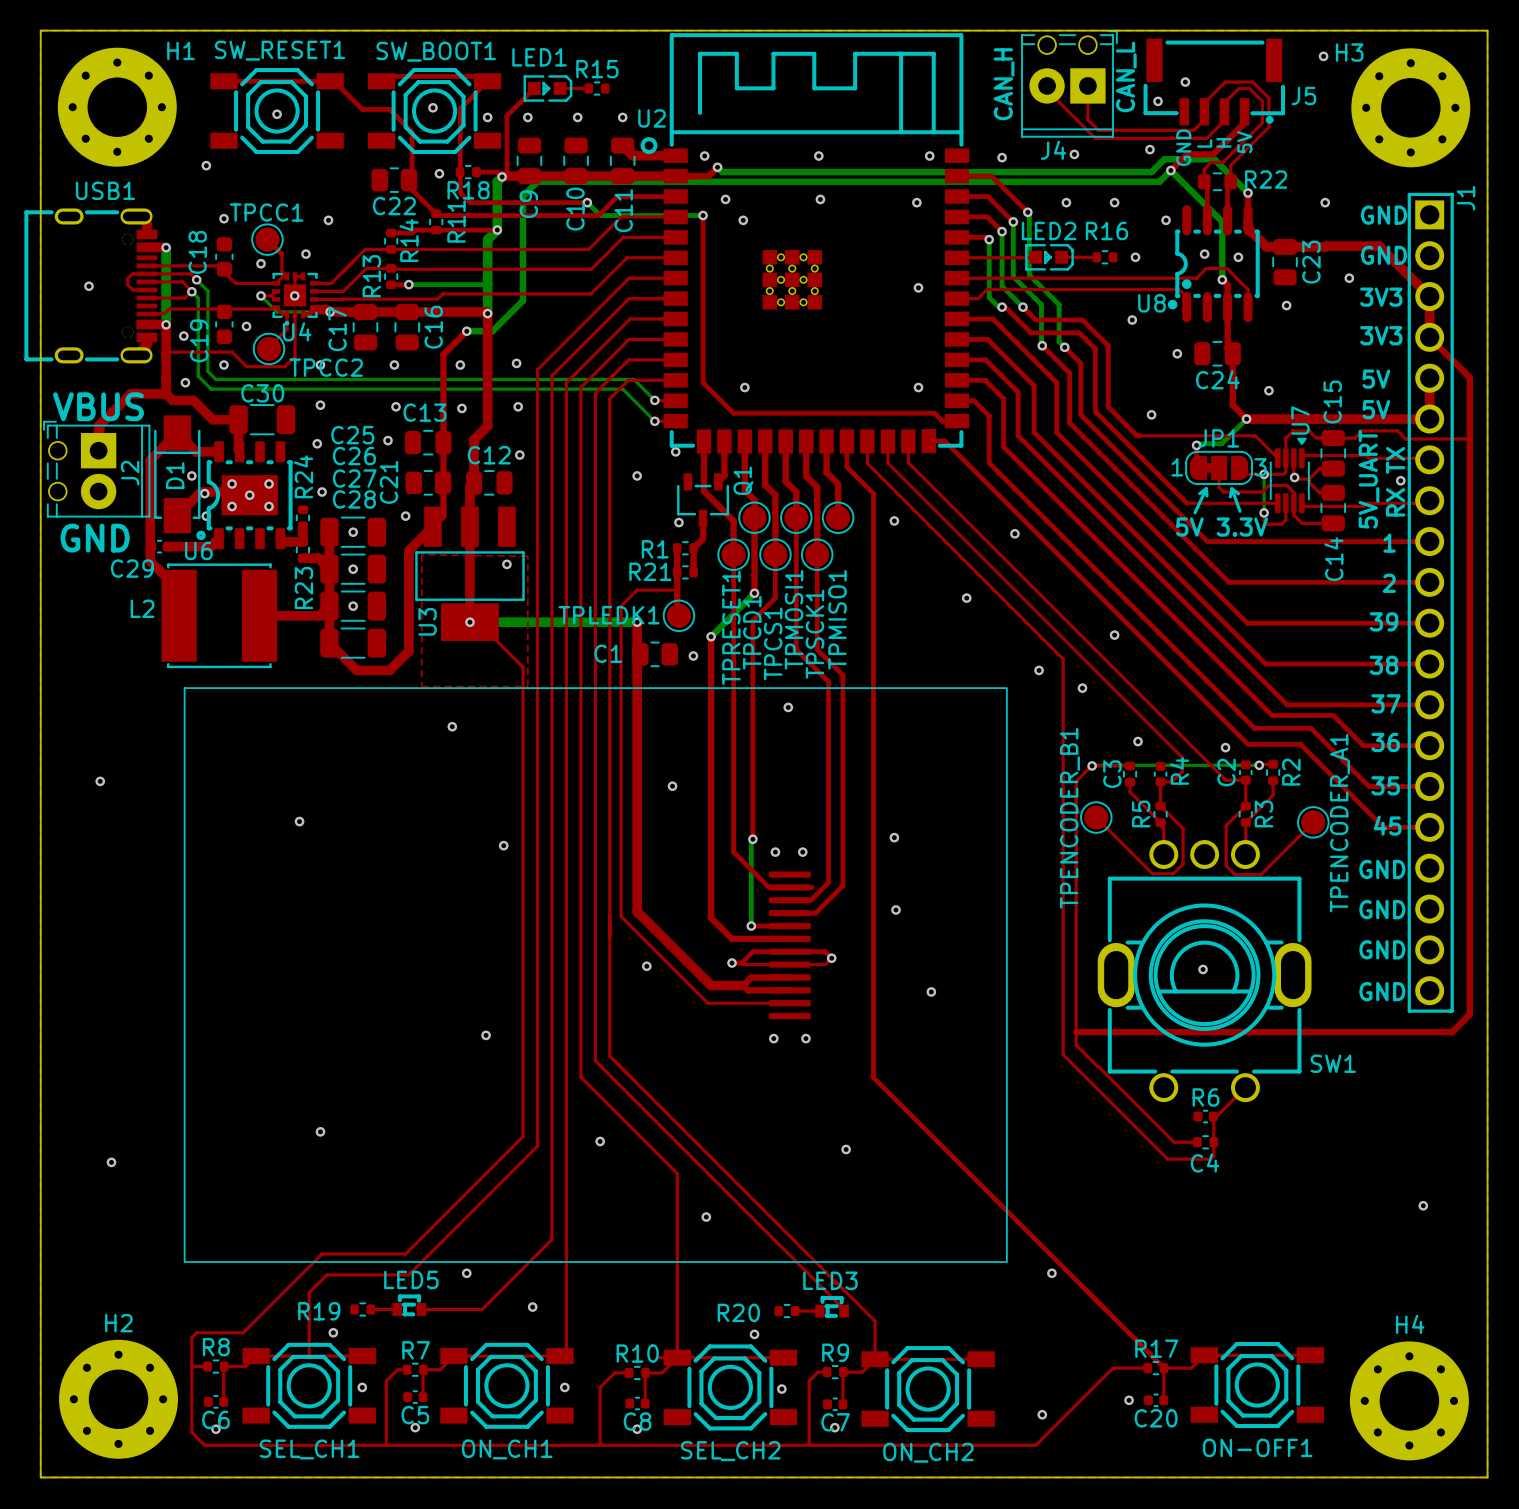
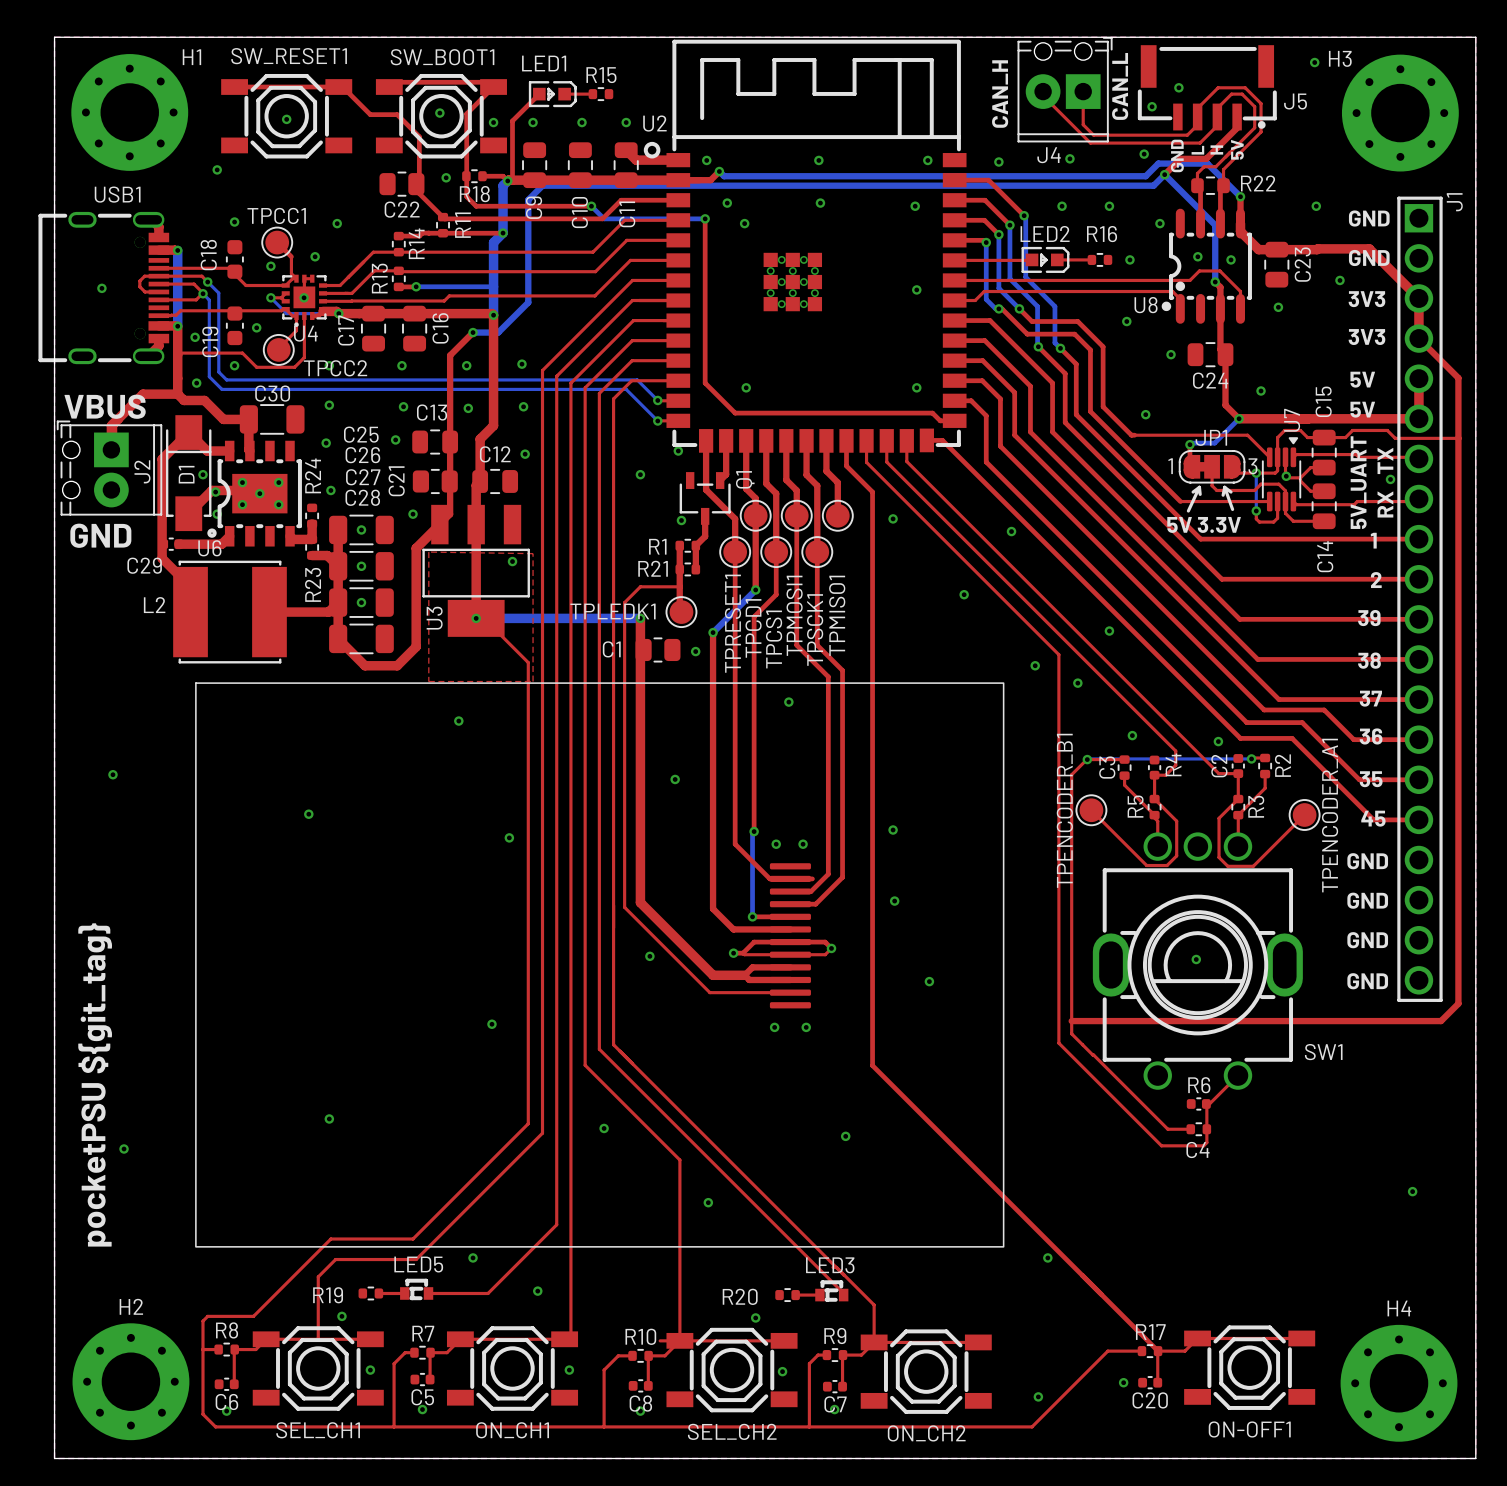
text: none -> pocketPSU ${git_tag} (95, 1084)

